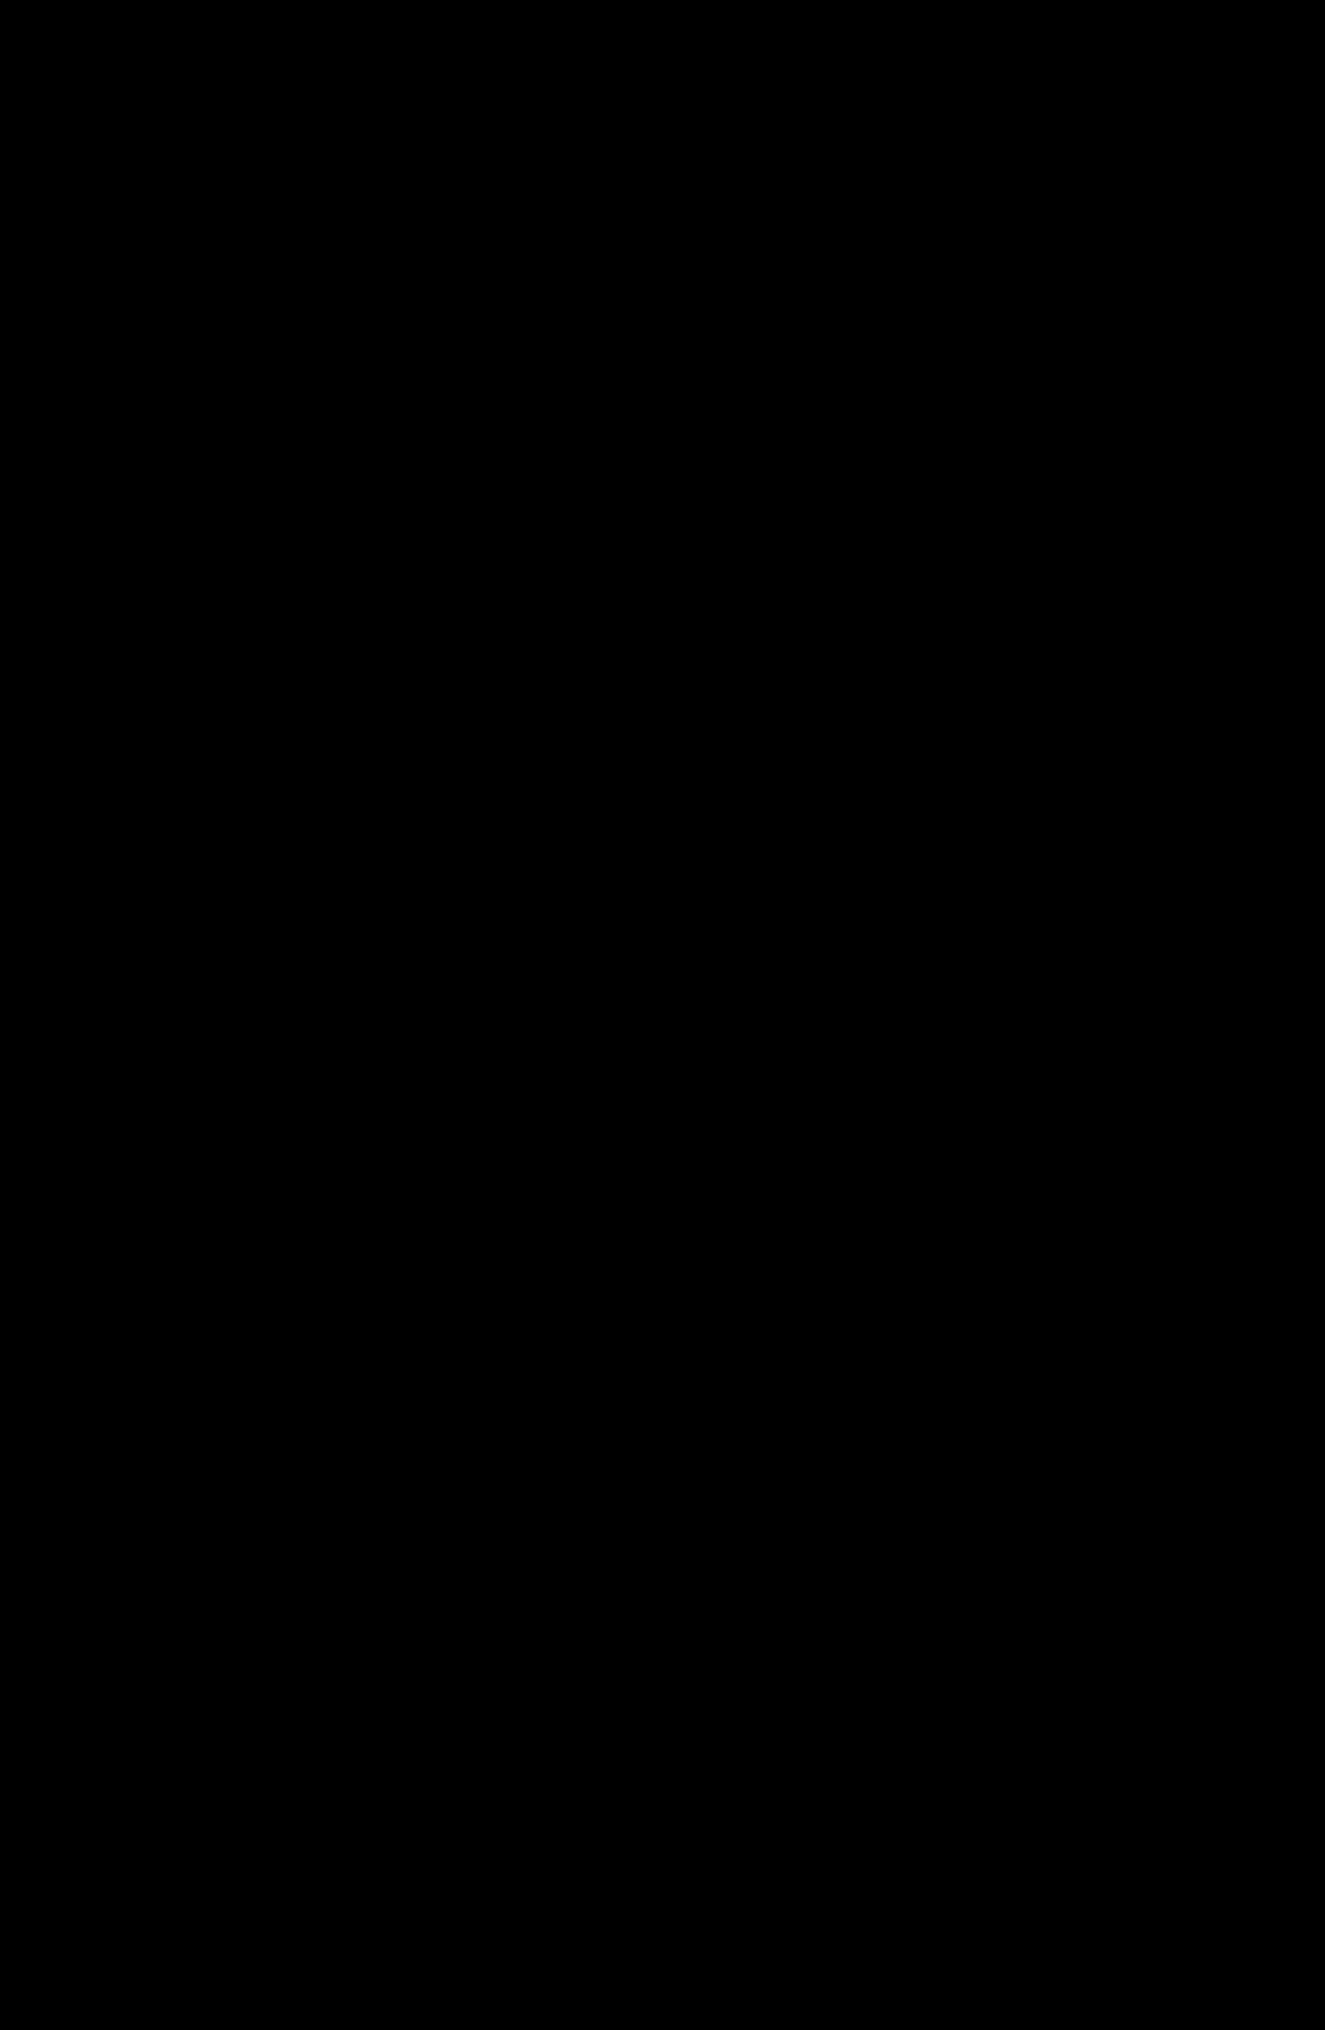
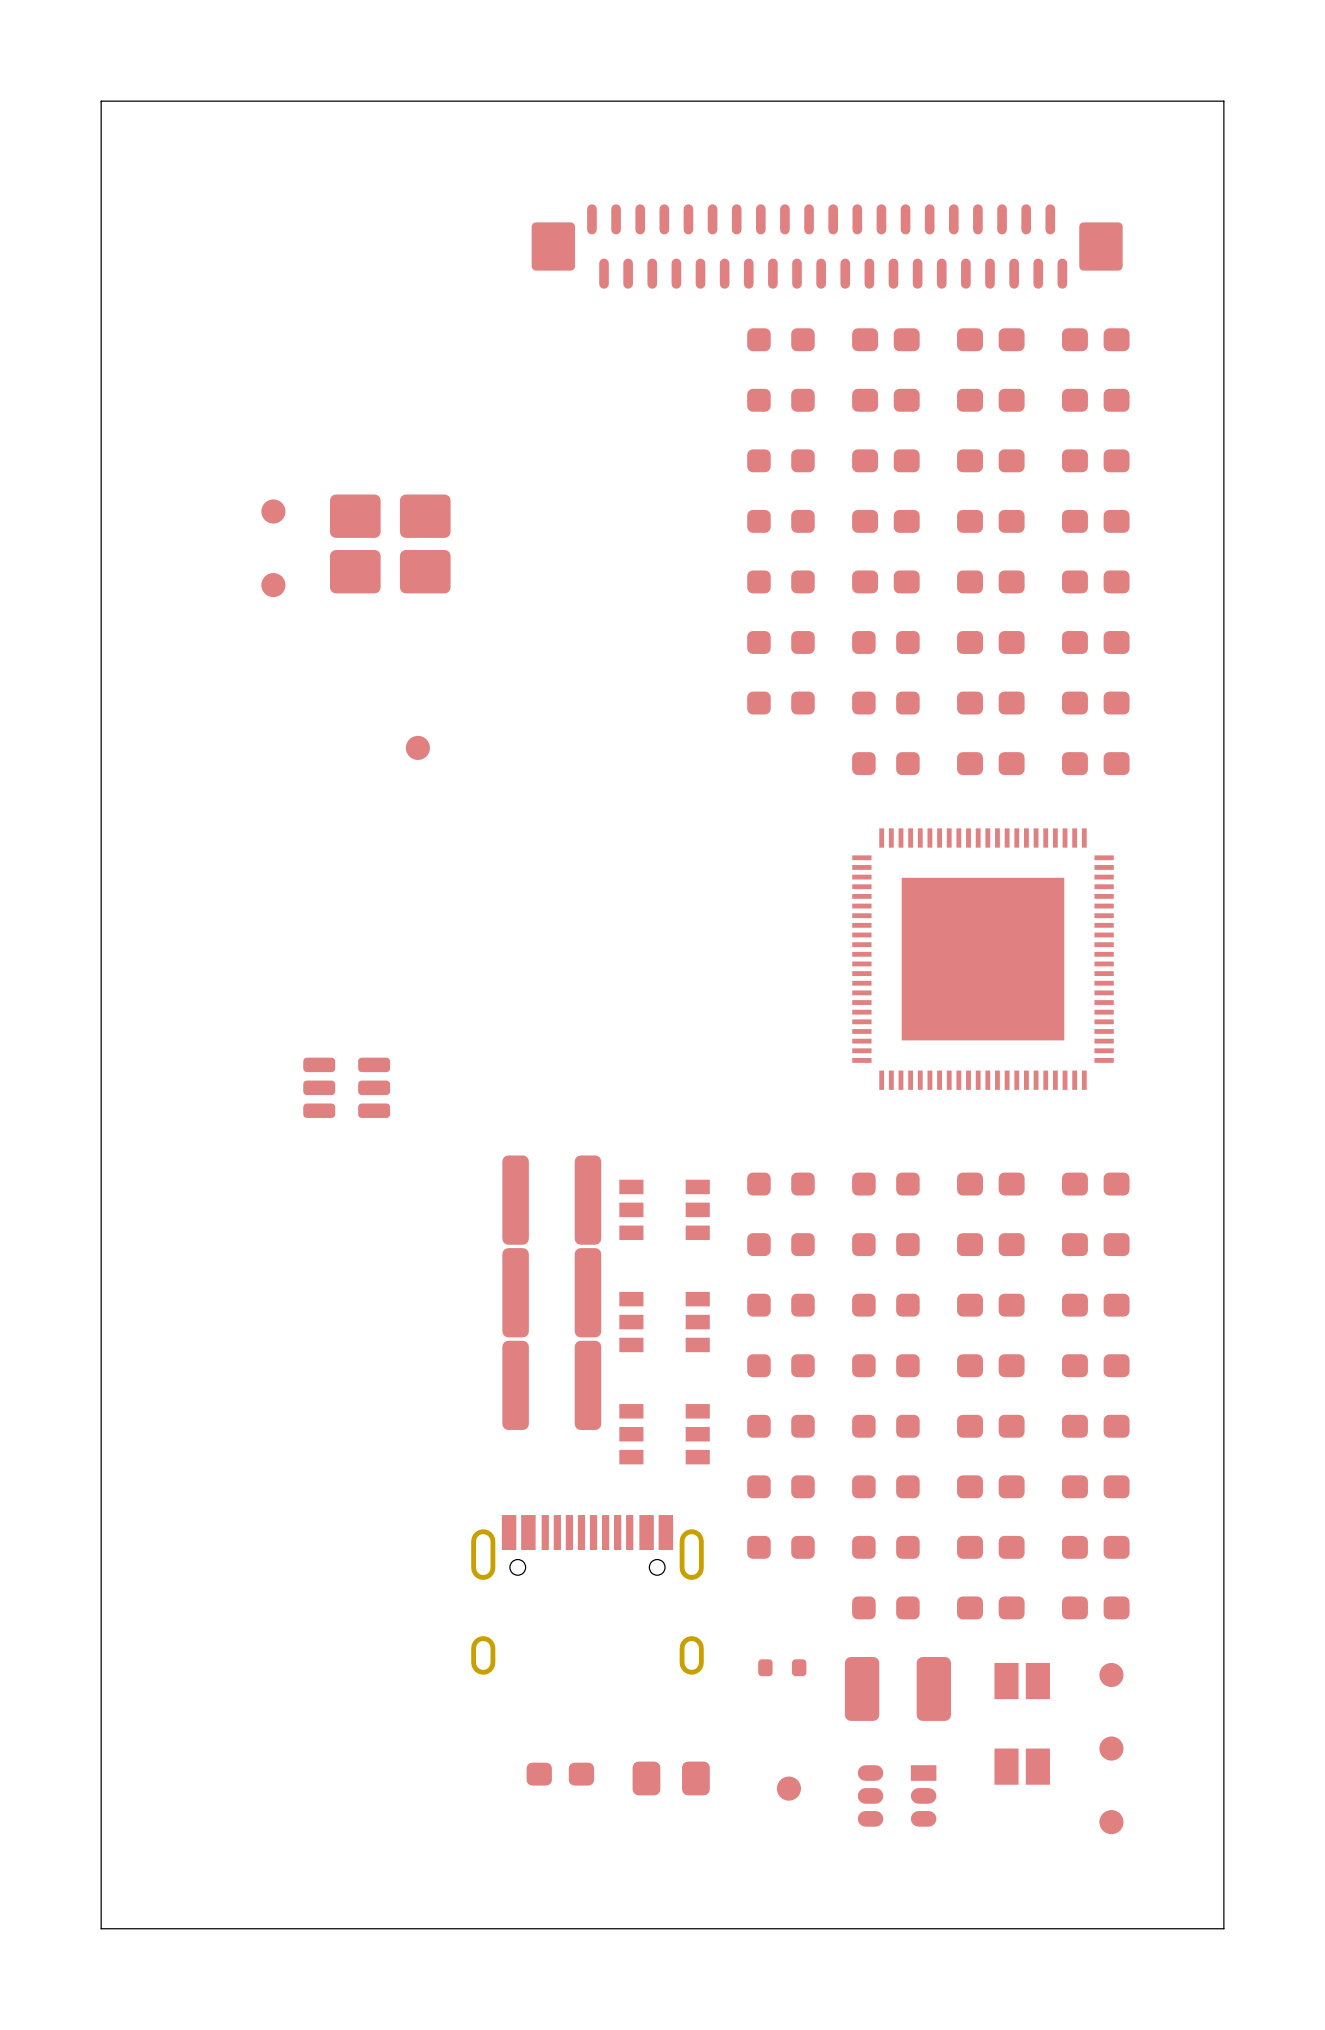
board edge: none -> (1223, 101) (101, 101) (101, 1928) (1223, 1928) (1223, 101)
part: none -> (827, 246)
part: none -> (780, 339)
part: none -> (885, 339)
part: none -> (990, 339)
part: none -> (1095, 339)
part: none -> (780, 400)
part: none -> (885, 400)
part: none -> (990, 400)
part: none -> (1095, 400)
part: none -> (780, 460)
part: none -> (885, 460)
part: none -> (990, 460)
part: none -> (1095, 460)
part: none -> (273, 511)
part: none -> (780, 521)
part: none -> (885, 521)
part: none -> (990, 521)
part: none -> (1095, 521)
part: none -> (390, 543)
part: none -> (780, 581)
part: none -> (885, 581)
part: none -> (990, 581)
part: none -> (1095, 581)
part: none -> (273, 585)
part: none -> (780, 642)
part: none -> (885, 642)
part: none -> (990, 642)
part: none -> (1095, 642)
part: none -> (780, 703)
part: none -> (885, 703)
part: none -> (990, 703)
part: none -> (1095, 703)
part: none -> (417, 747)
part: none -> (885, 763)
part: none -> (990, 763)
part: none -> (1095, 763)
part: none -> (982, 959)
part: none -> (346, 1087)
part: none -> (780, 1184)
part: none -> (885, 1184)
part: none -> (990, 1184)
part: none -> (1095, 1184)
part: none -> (551, 1200)
part: none -> (664, 1209)
part: none -> (780, 1244)
part: none -> (885, 1244)
part: none -> (990, 1244)
part: none -> (1095, 1244)
part: none -> (551, 1292)
part: none -> (780, 1305)
part: none -> (885, 1305)
part: none -> (990, 1305)
part: none -> (1095, 1305)
part: none -> (664, 1322)
part: none -> (780, 1365)
part: none -> (885, 1365)
part: none -> (990, 1365)
part: none -> (1095, 1365)
part: none -> (551, 1385)
part: none -> (780, 1426)
part: none -> (885, 1426)
part: none -> (990, 1426)
part: none -> (1095, 1426)
part: none -> (664, 1434)
part: none -> (780, 1486)
part: none -> (885, 1486)
part: none -> (990, 1486)
part: none -> (1095, 1486)
part: none -> (780, 1547)
part: none -> (885, 1547)
part: none -> (990, 1547)
part: none -> (1095, 1547)
part: none -> (587, 1594)
part: none -> (885, 1607)
part: none -> (990, 1607)
part: none -> (1095, 1607)
part: none -> (782, 1667)
part: none -> (1111, 1674)
part: none -> (1022, 1681)
part: none -> (897, 1688)
part: none -> (1111, 1748)
part: none -> (1022, 1766)
part: none -> (560, 1774)
part: none -> (671, 1778)
part: none -> (788, 1788)
part: none -> (897, 1795)
part: none -> (1111, 1822)

